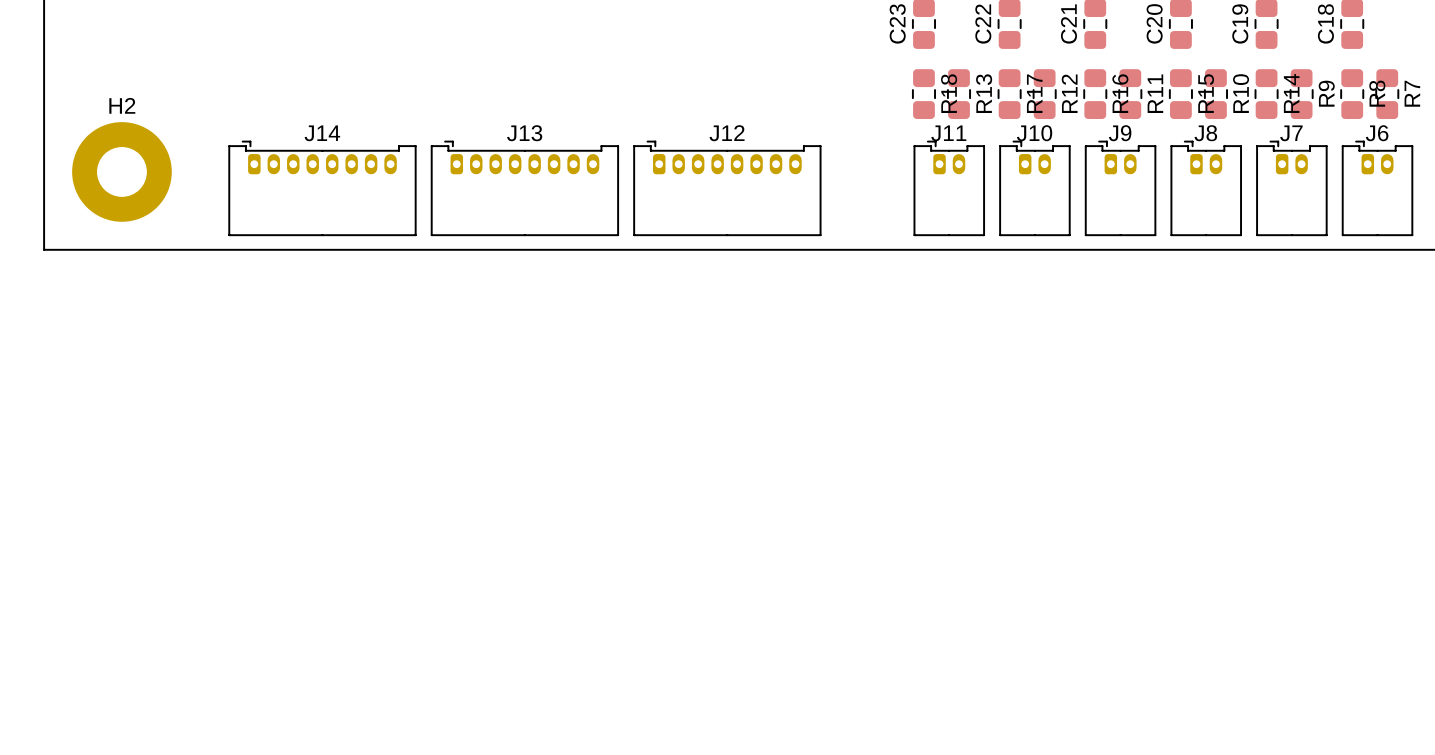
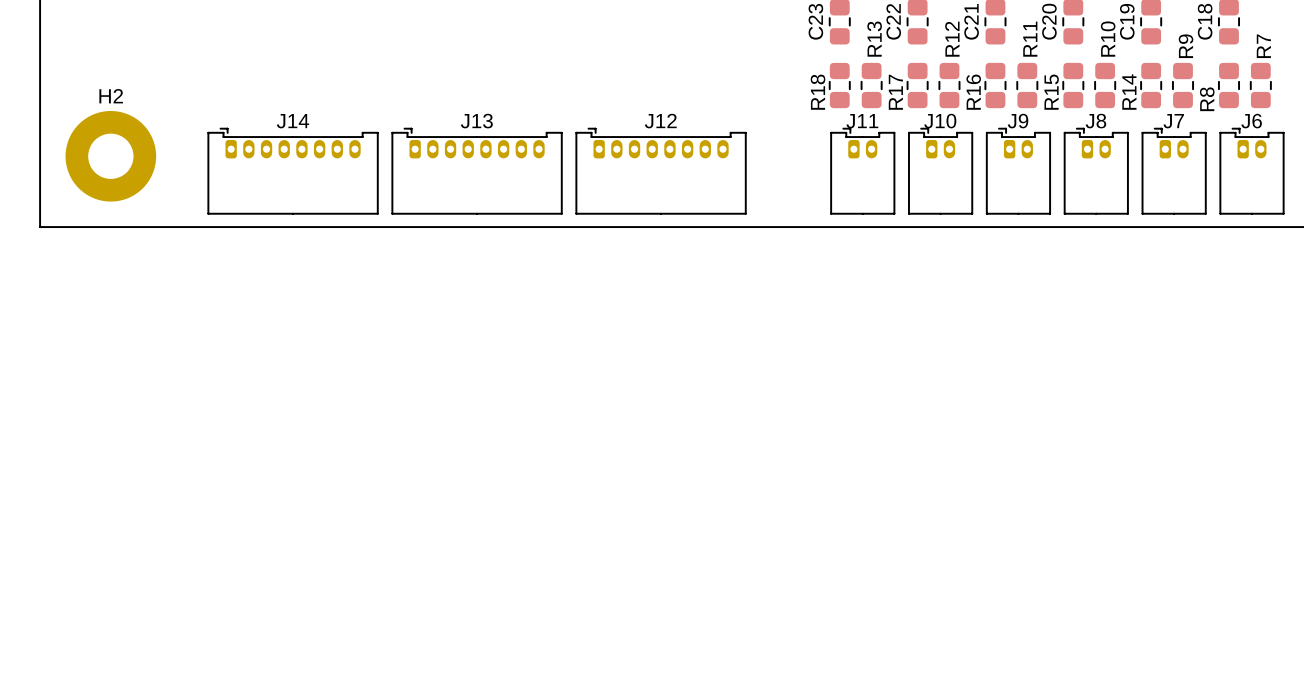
R18 name position: R18 (949, 93) -> R18 (818, 92)
R13 name position: R13 (984, 93) -> R13 (874, 39)
R17 name position: R17 (1034, 93) -> R17 (895, 92)
R12 name position: R12 (1069, 93) -> R12 (952, 39)
R16 name position: R16 (1120, 93) -> R16 (973, 92)
R11 name position: R11 (1155, 93) -> R11 (1030, 39)
R15 name position: R15 (1206, 93) -> R15 (1051, 92)
R10 name position: R10 (1241, 93) -> R10 (1108, 39)
R14 name position: R14 (1291, 93) -> R14 (1129, 92)
R9 name position: R9 (1326, 93) -> R9 (1186, 46)
R8 name position: R8 (1377, 93) -> R8 (1207, 99)
R7 name position: R7 (1412, 93) -> R7 (1263, 46)

